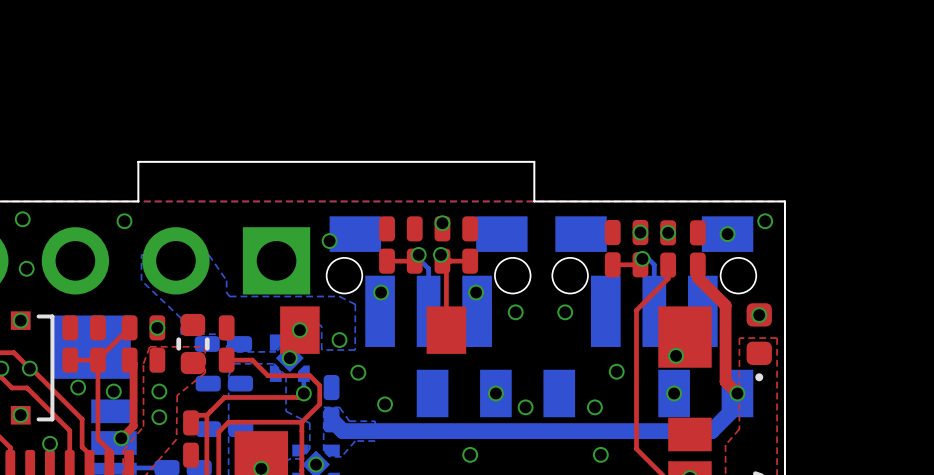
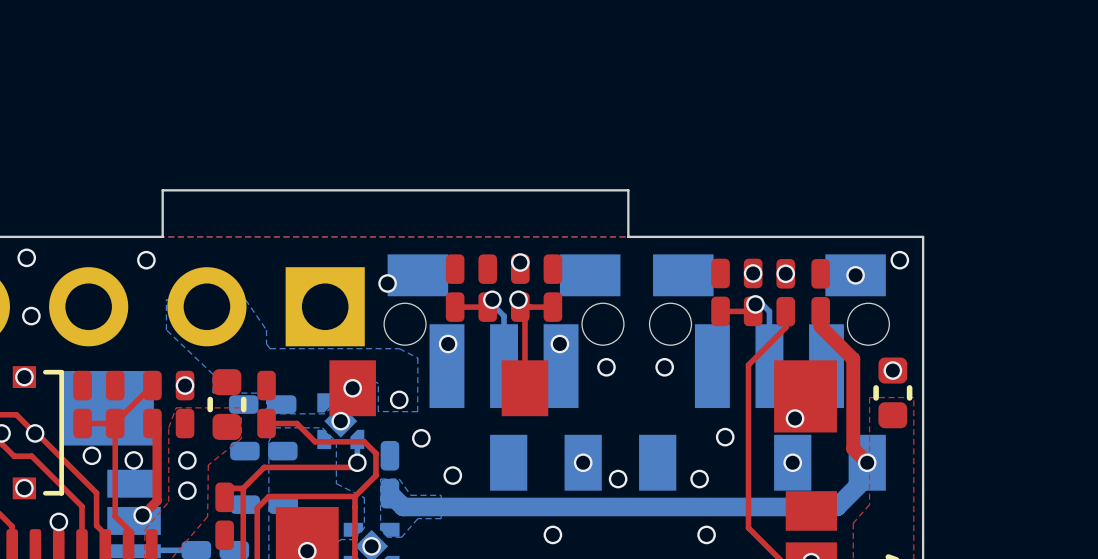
part footprint: [746, 303, 772, 382] -> [873, 357, 913, 429]

